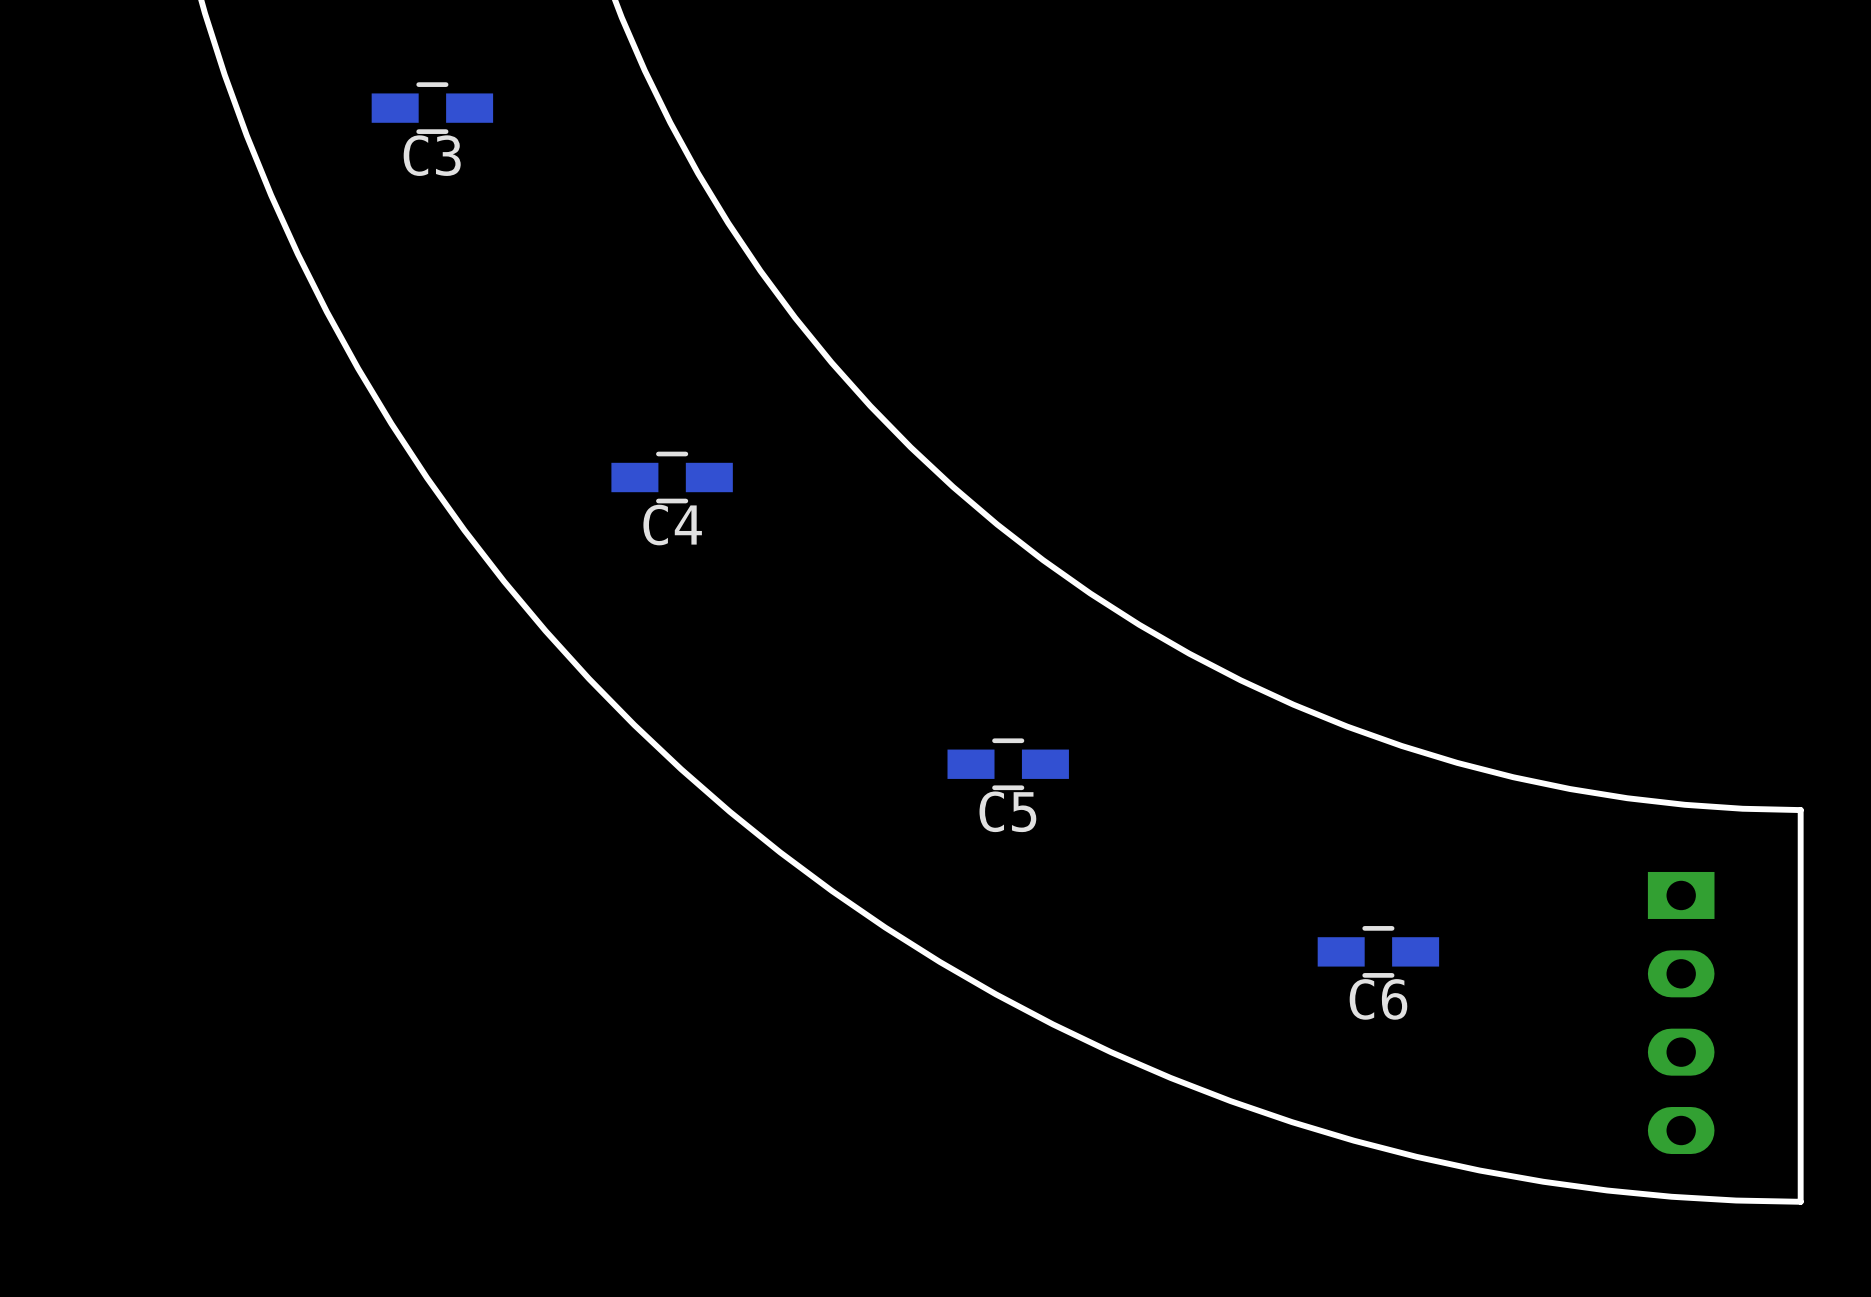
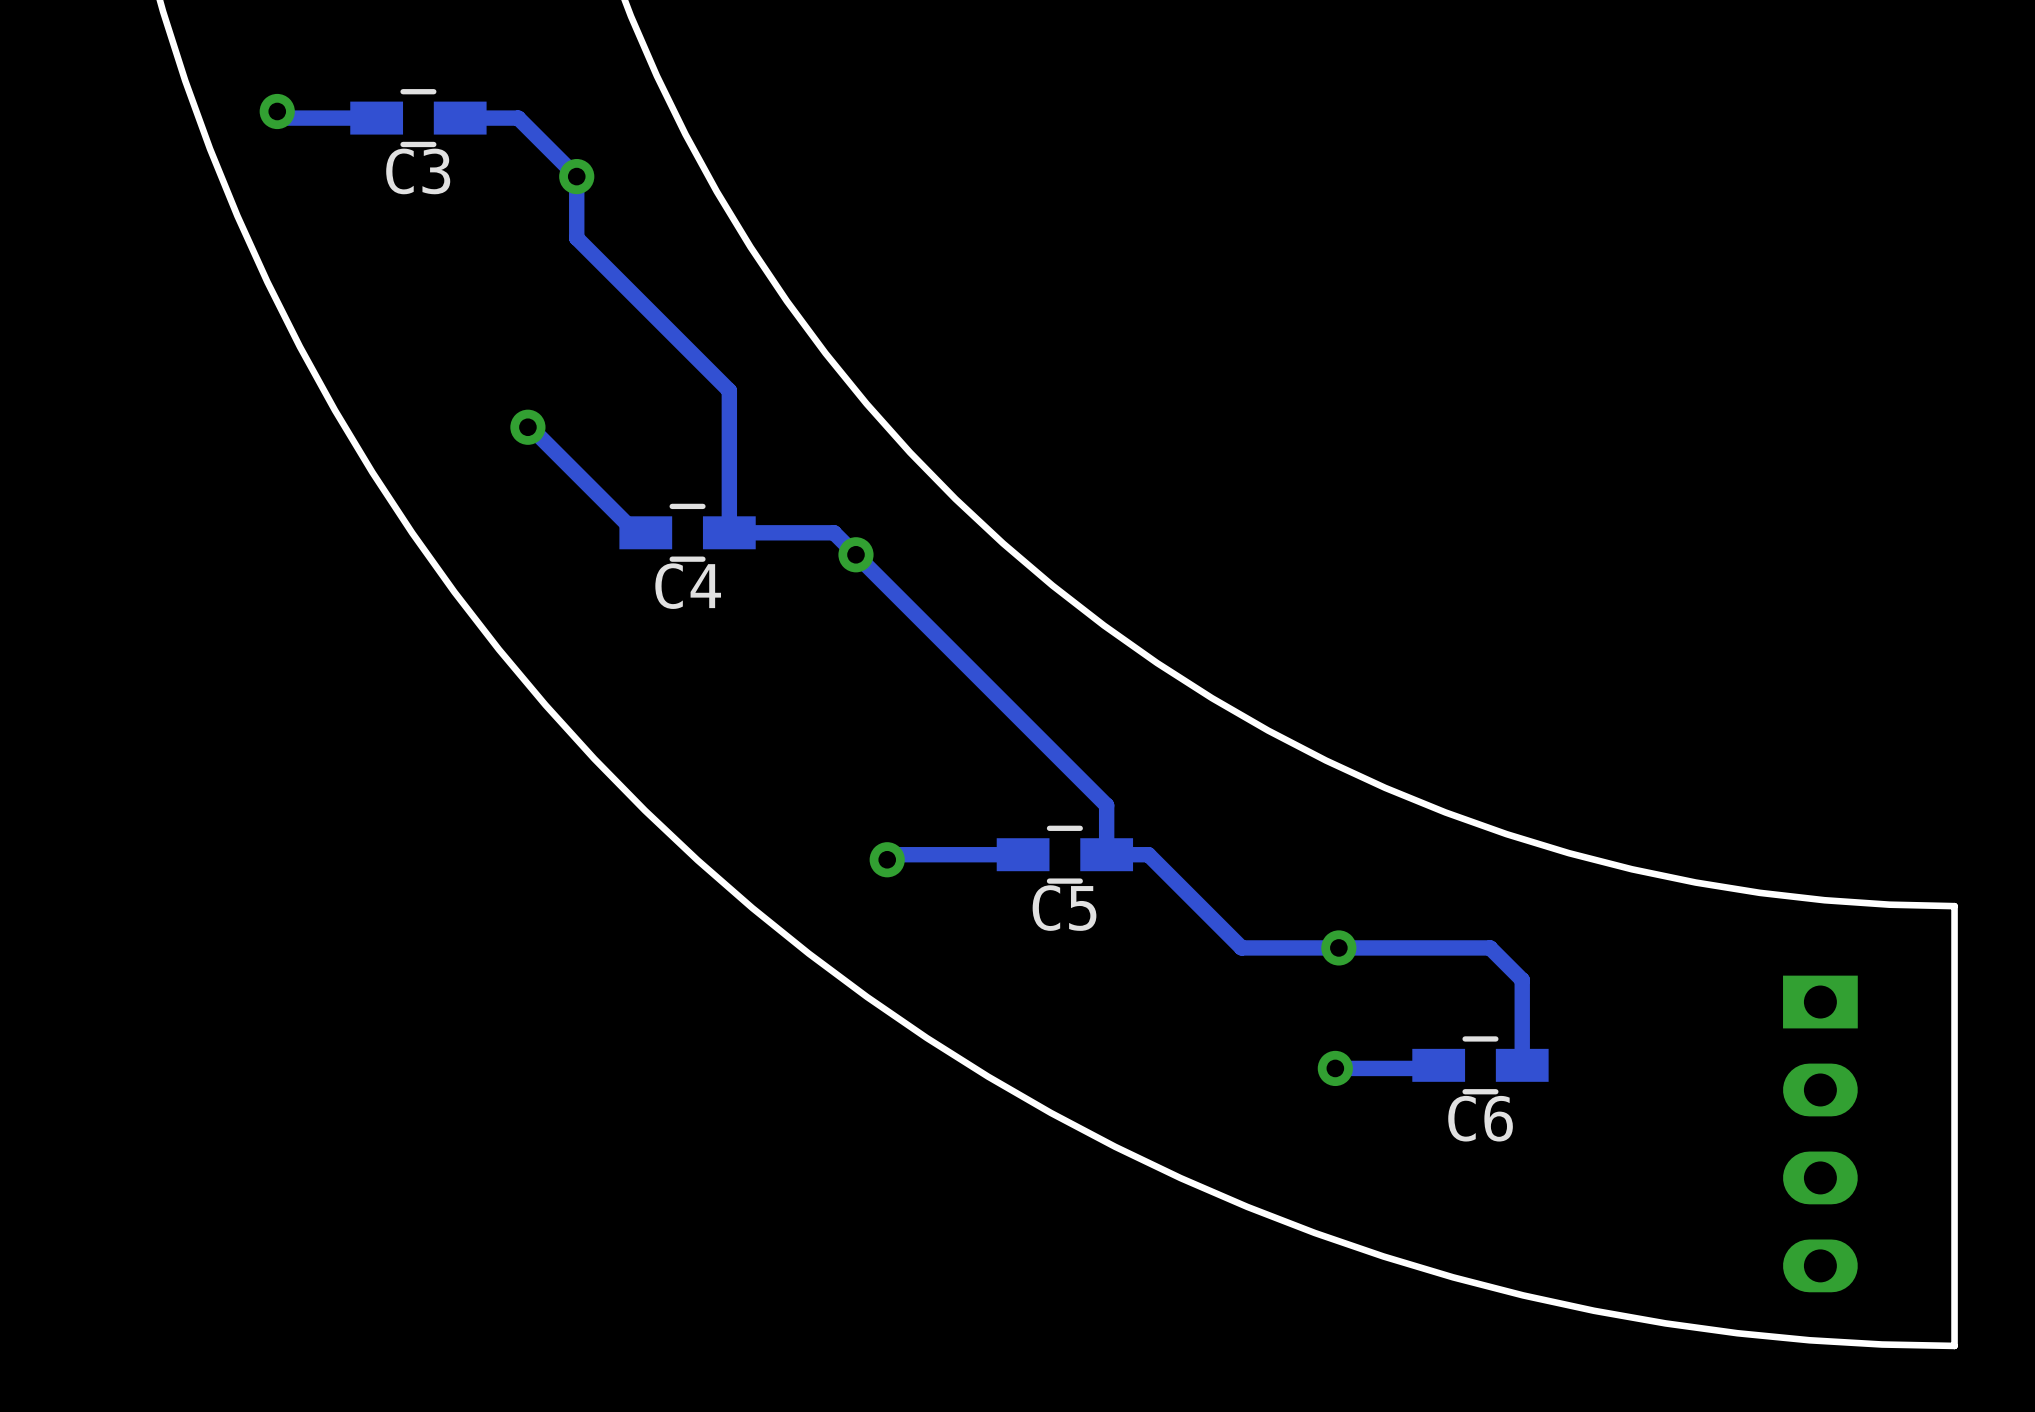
track: none -> (277, 111) (283, 118) (376, 118)
via: none -> (277, 111)
track: none -> (460, 118) (518, 118) (576, 176) (576, 238) (729, 390) (729, 532) (834, 532) (1106, 805) (1106, 854) (1148, 854) (1241, 947) (1490, 947) (1522, 980) (1522, 1065)
via: none -> (576, 176)
track: none -> (527, 427) (530, 427) (635, 532) (645, 532)
via: none -> (527, 427)
via: none -> (855, 554)
track: none -> (1023, 854) (892, 854) (887, 859)
via: none -> (887, 859)
via: none -> (1338, 947)
track: none -> (1438, 1065) (1435, 1068) (1335, 1068)
via: none -> (1335, 1068)

